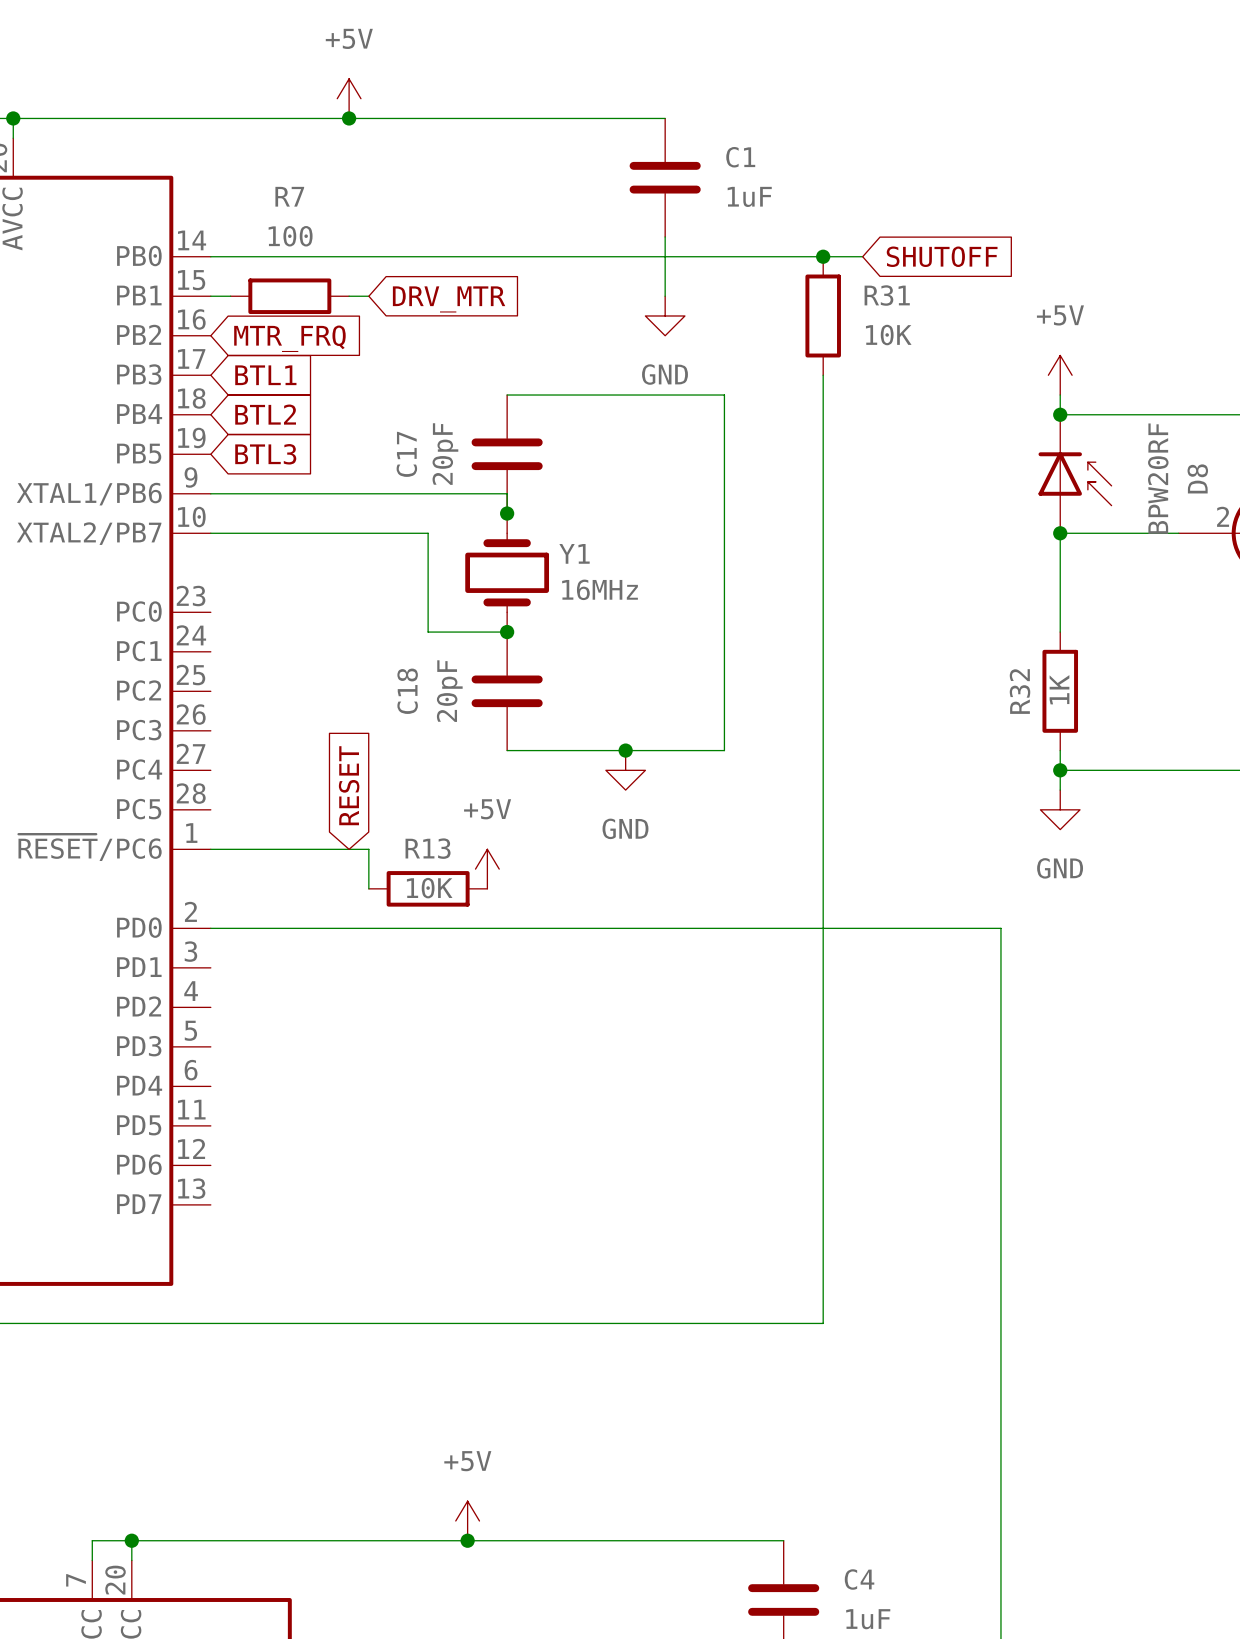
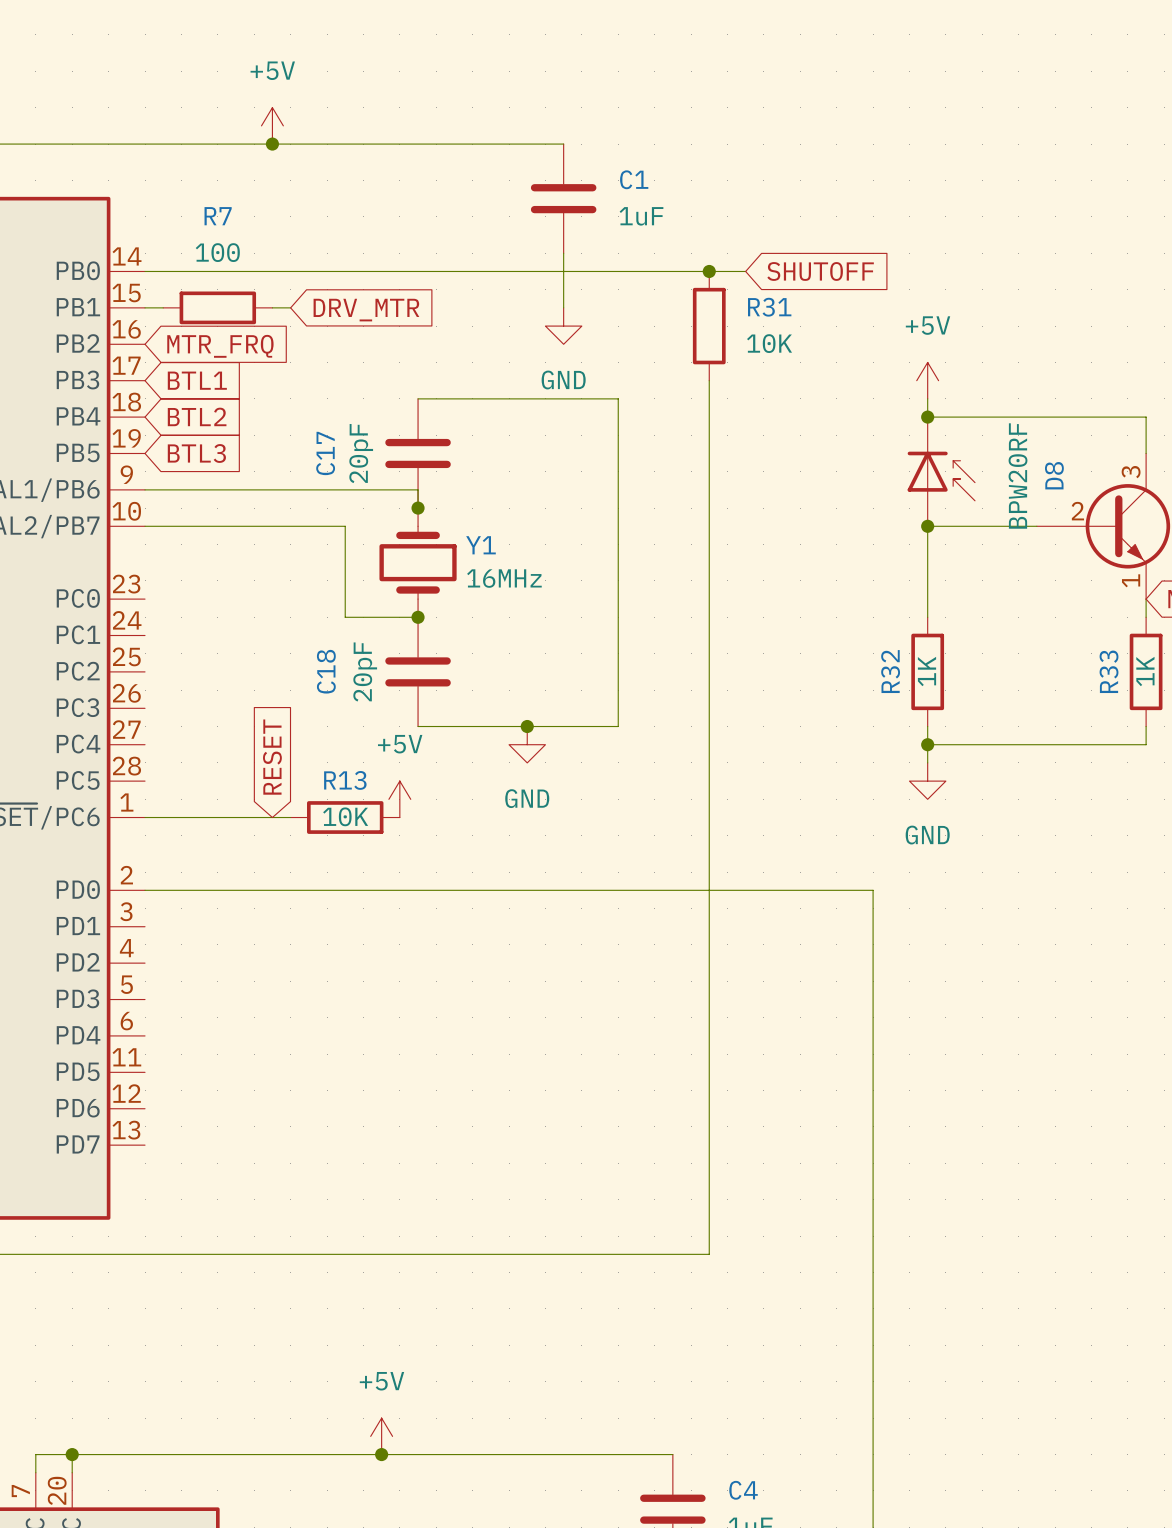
wire: (368, 849) (368, 888) -> none
power symbol position: +5V (487, 869) -> +5V (399, 799)
R13 position: (428, 888) -> (345, 817)

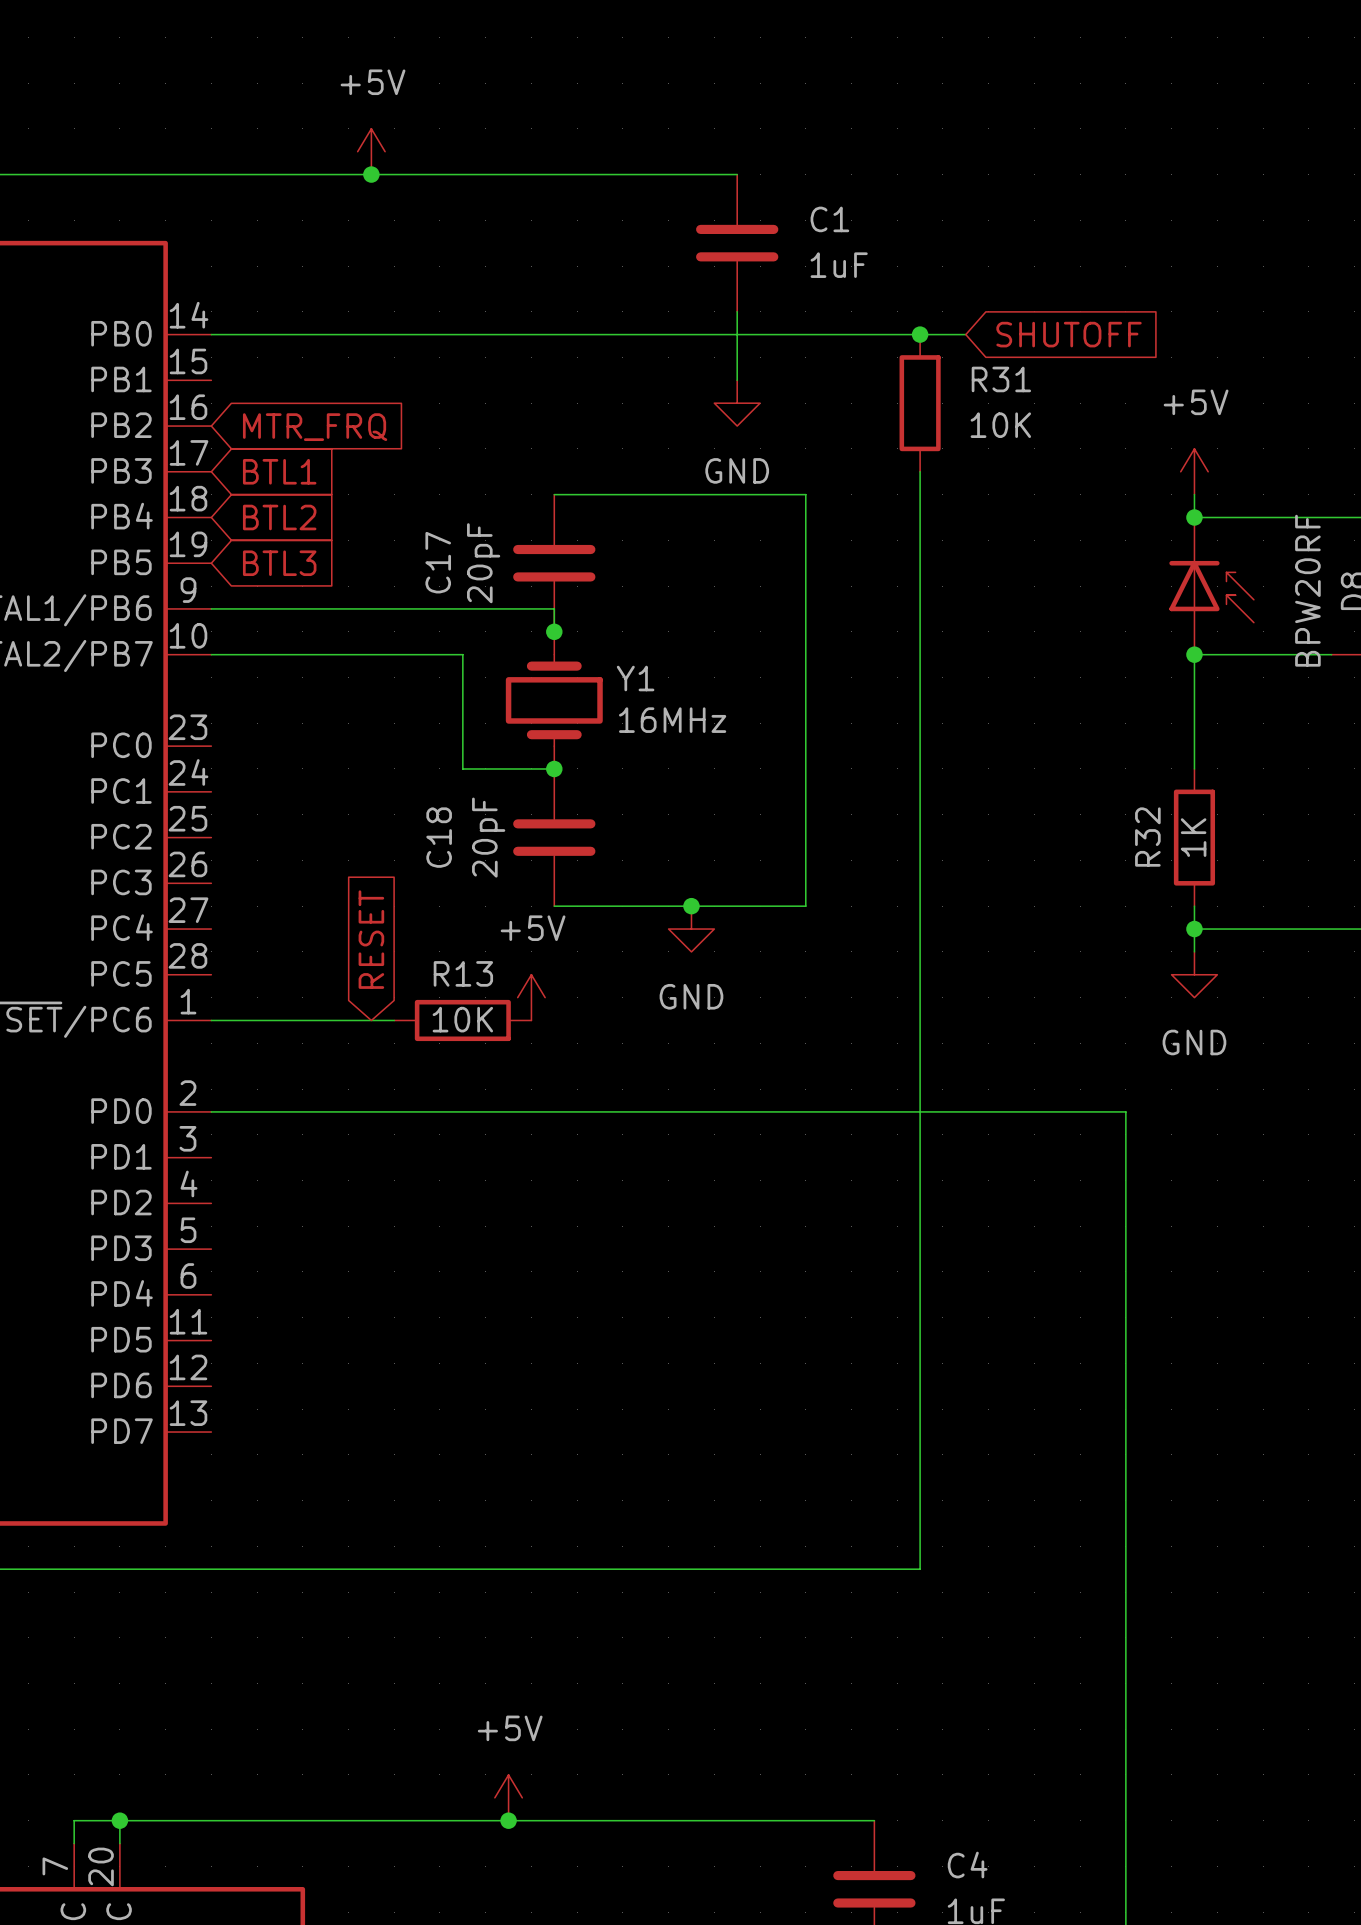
wire: (145, 307) (163, 307) -> none
R7: 100 (217, 307) -> none
wire: (272, 307) (290, 307) -> none
global label: DRV_MTR (366, 310) -> none

